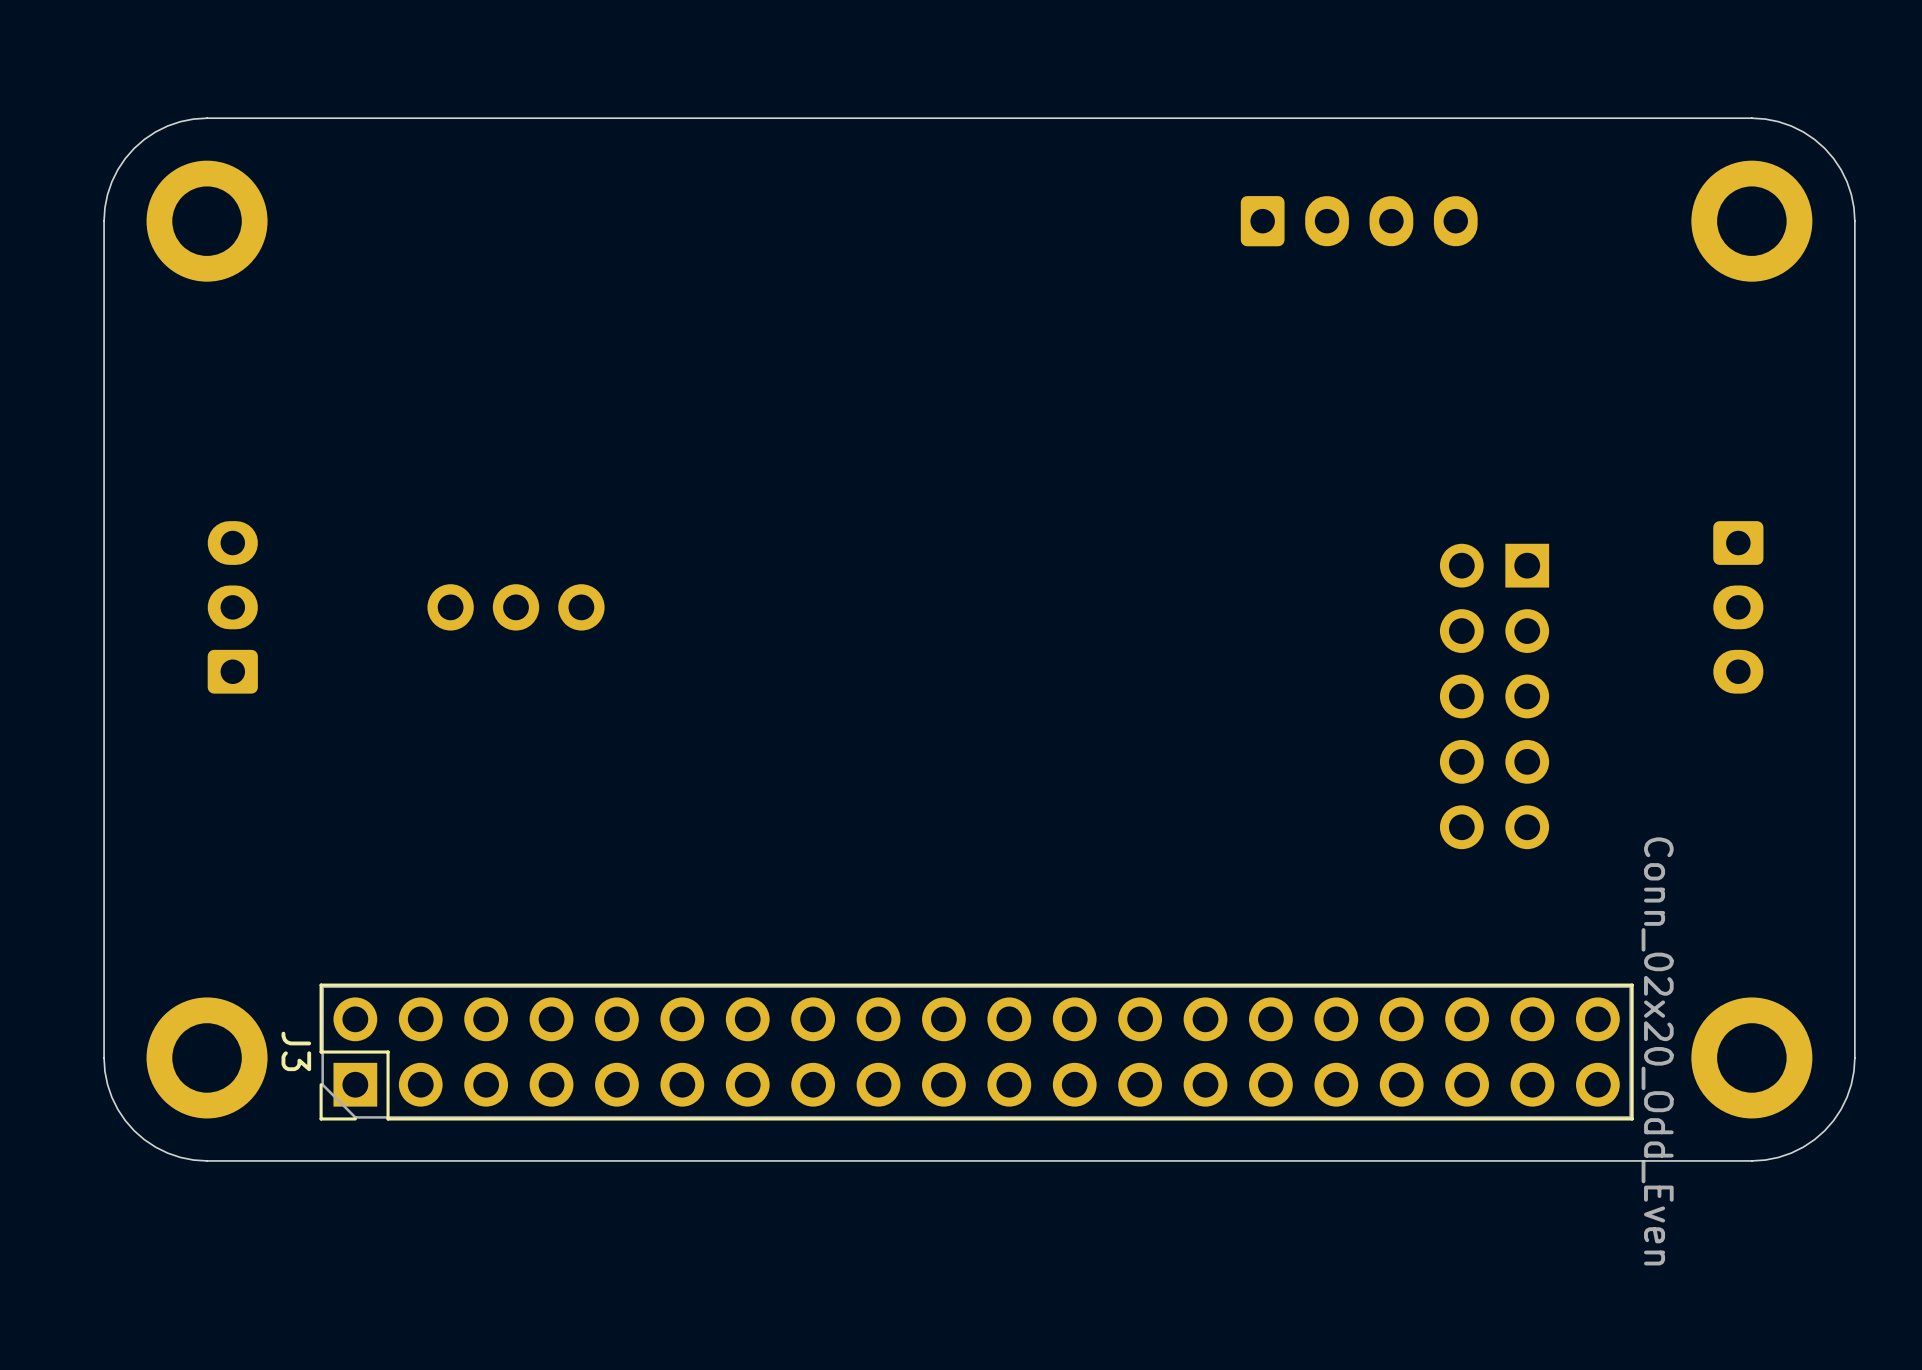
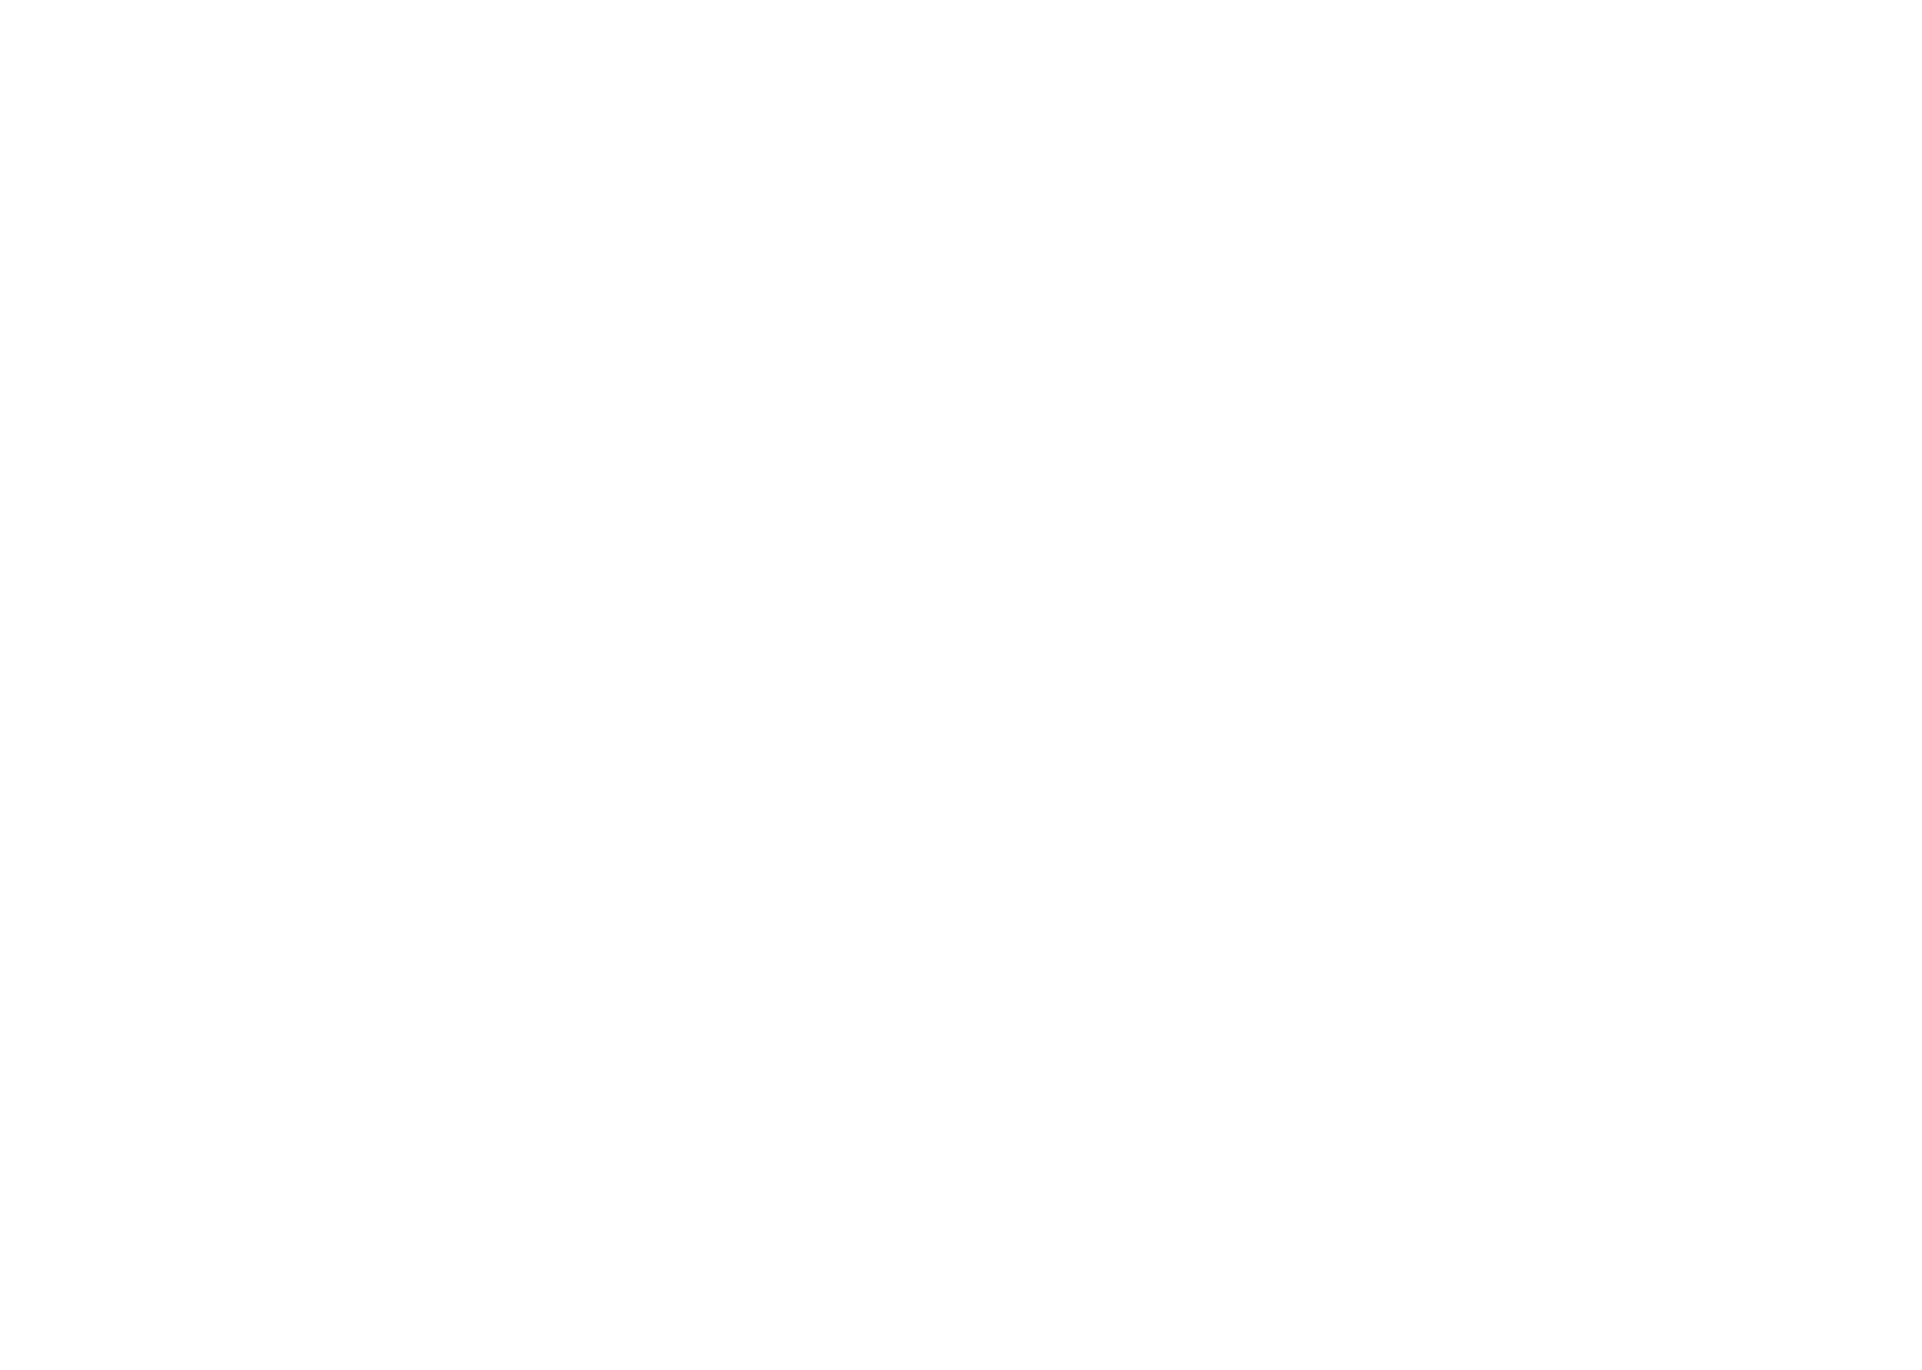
board edge: (1751, 118) (207, 118) (180, 121) (155, 131) (134, 148) (117, 169) (107, 194) (104, 221) (104, 1057) (107, 1084) (117, 1109) (134, 1130) (155, 1147) (180, 1157) (207, 1160) (1751, 1160) (1778, 1157) (1803, 1147) (1824, 1130) (1841, 1109) (1851, 1084) (1854, 1057) (1854, 221) (1851, 194) (1847, 181) (1841, 169) (1824, 148) (1803, 131) (1791, 126) (1765, 119) (1751, 118) -> none
part: (207, 221) -> none
part: (1359, 221) -> none
part: (1751, 221) -> none
part: (232, 607) -> none
part: (516, 607) -> none
part: (1738, 607) -> none
part: (1494, 696) -> none
J3: Conn_02x20_Odd_Even (976, 1052) -> none
part: (207, 1057) -> none
part: (1751, 1057) -> none

